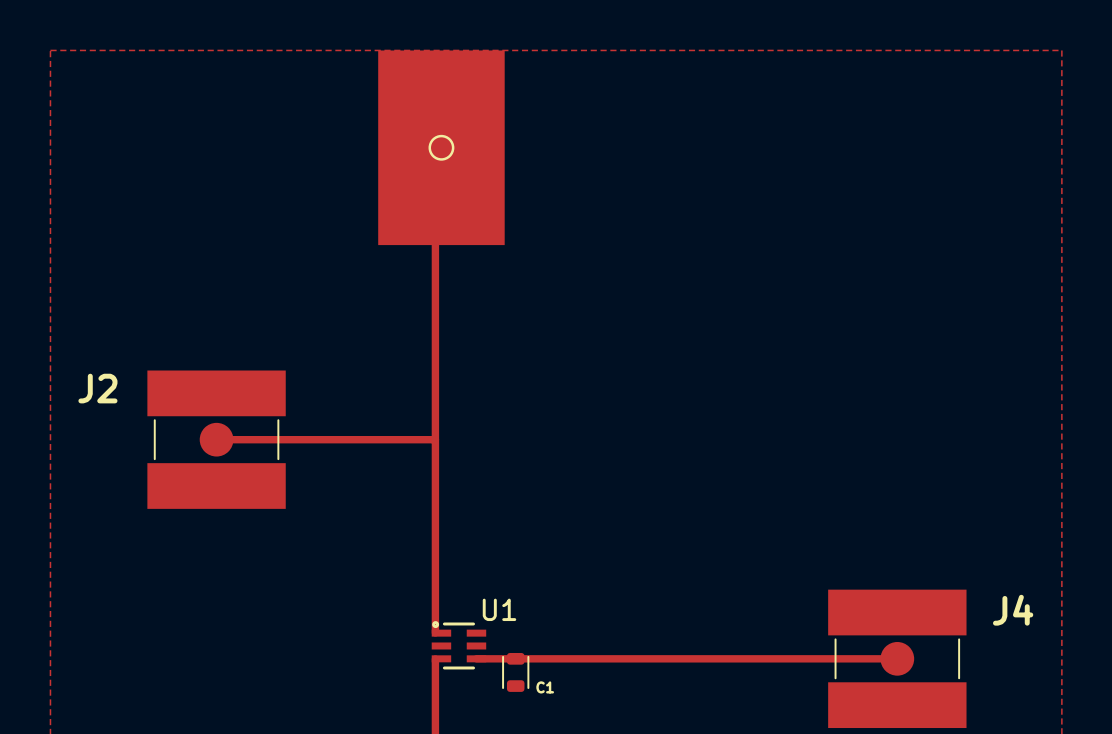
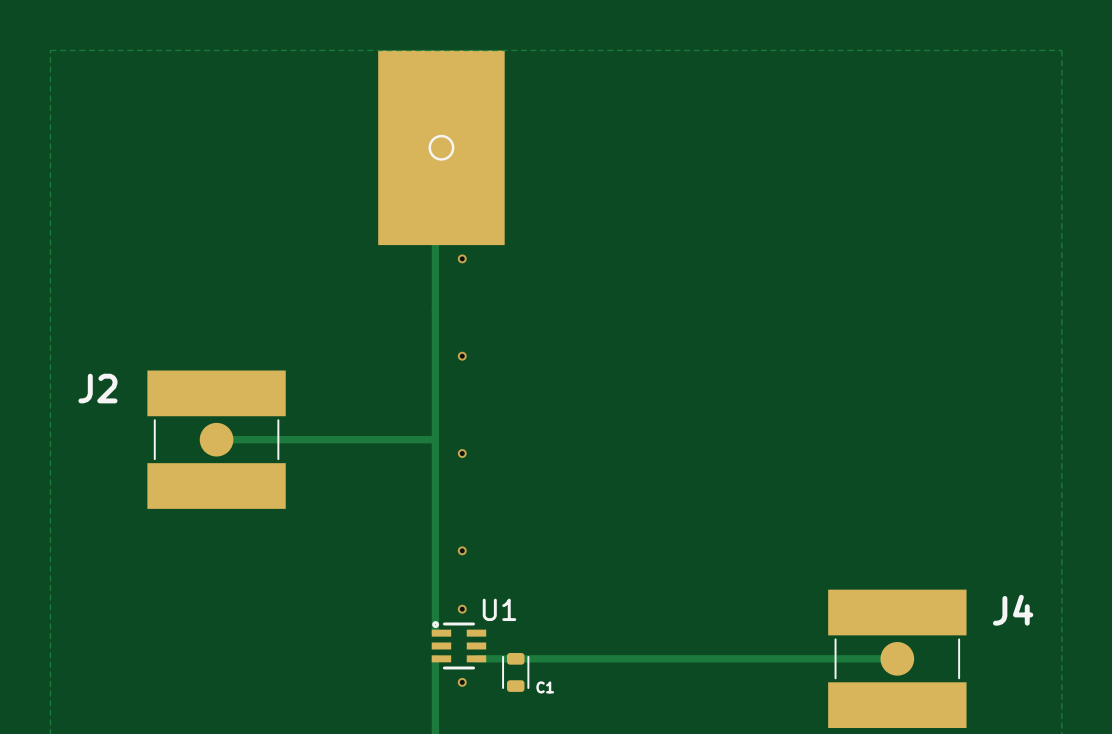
via: none -> (462, 258)
via: none -> (462, 356)
via: none -> (462, 453)
via: none -> (462, 550)
via: none -> (462, 609)
via: none -> (462, 682)

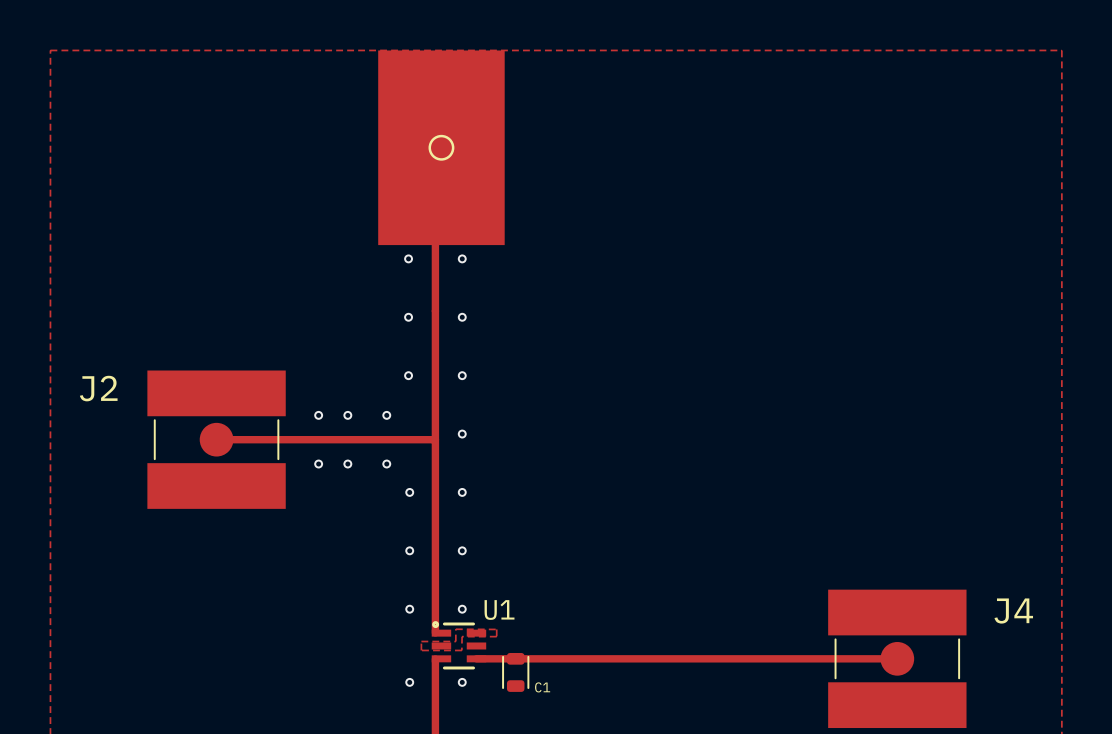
via: none -> (408, 258)
via: none -> (408, 317)
via: none -> (462, 317)
via: (462, 356) -> none
via: none -> (408, 375)
via: none -> (462, 375)
via: none -> (318, 415)
via: none -> (347, 415)
via: none -> (386, 415)
via: none -> (462, 434)
via: (462, 453) -> none
via: none -> (318, 464)
via: none -> (347, 464)
via: none -> (386, 464)
via: none -> (409, 492)
via: none -> (462, 492)
via: none -> (409, 550)
via: none -> (409, 609)
zone outline: none -> (455, 629) (455, 641) (421, 641) (421, 650) (461, 650) (462, 636) (496, 636) (496, 629) (455, 629)
via: none -> (409, 682)

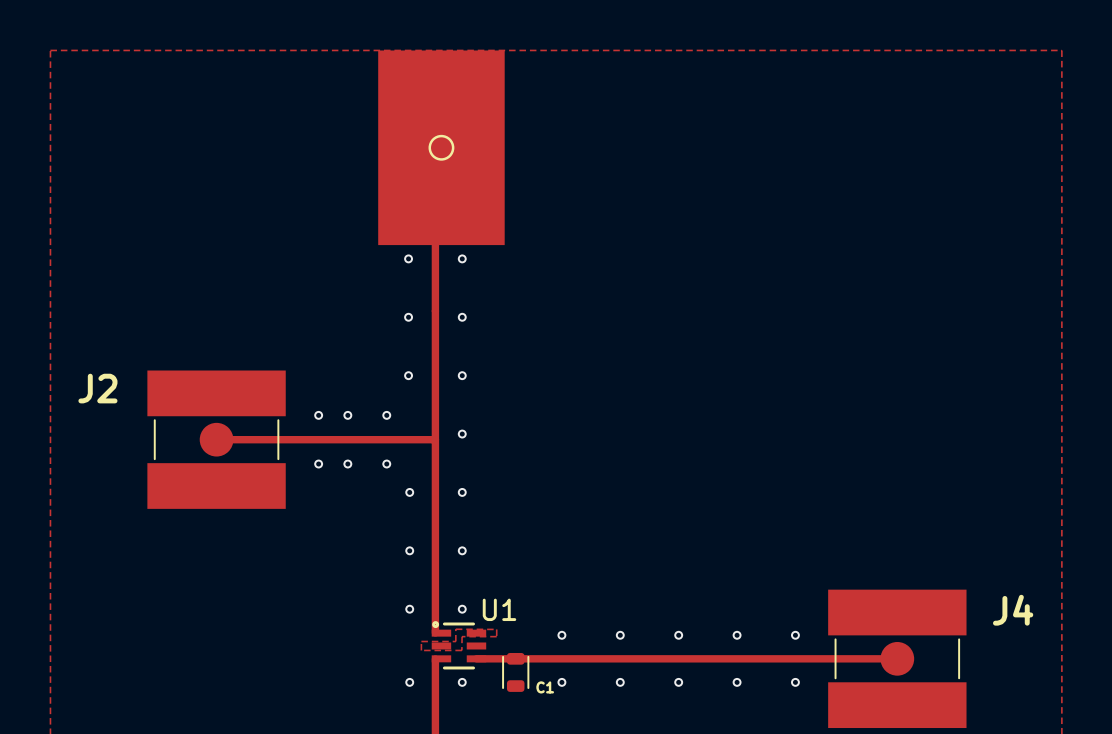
via: none -> (561, 635)
via: none -> (620, 635)
via: none -> (678, 635)
via: none -> (737, 635)
via: none -> (795, 635)
via: none -> (561, 682)
via: none -> (620, 682)
via: none -> (678, 682)
via: none -> (737, 682)
via: none -> (795, 682)

